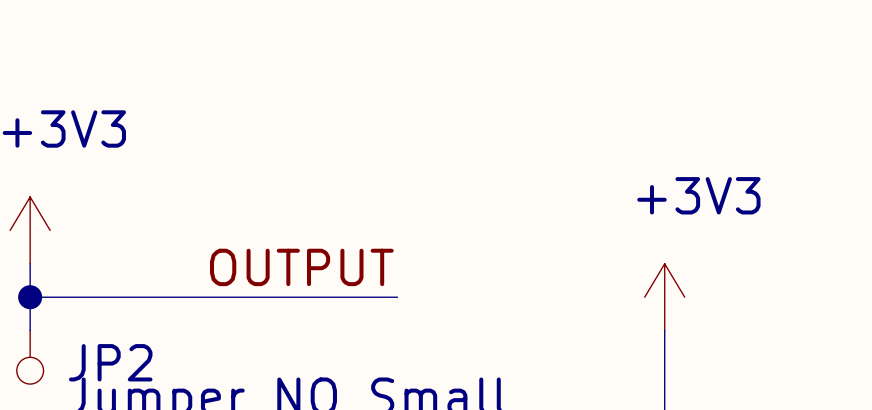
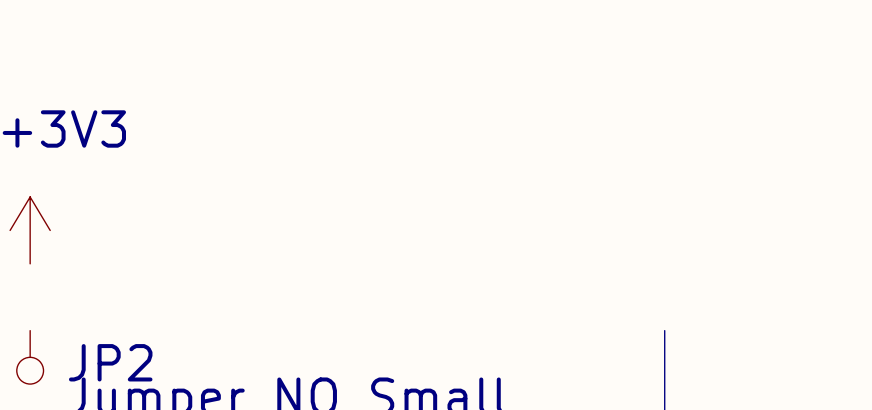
wire: (30, 263) (30, 330) -> none
label: OUTPUT (301, 267) -> none
wire: (30, 297) (397, 297) -> none
junction: (30, 297) -> none
power symbol: +3V3 (664, 297) -> none

